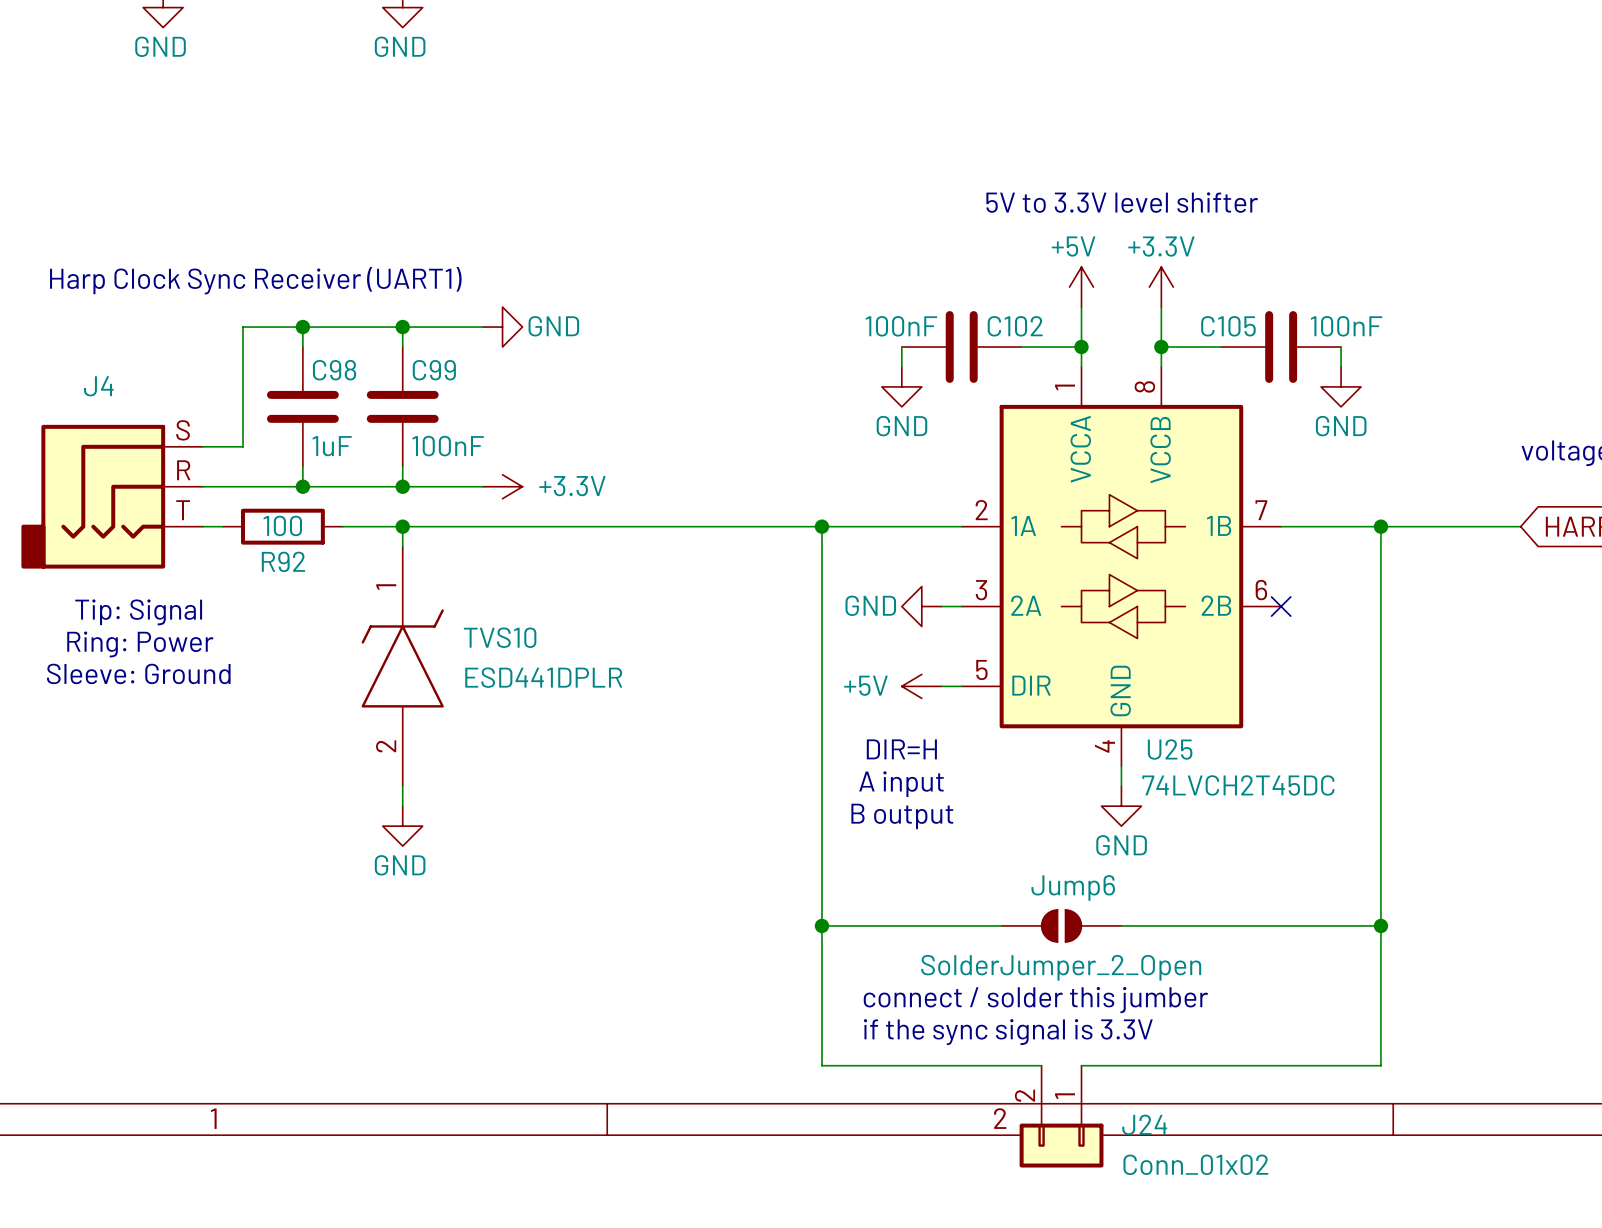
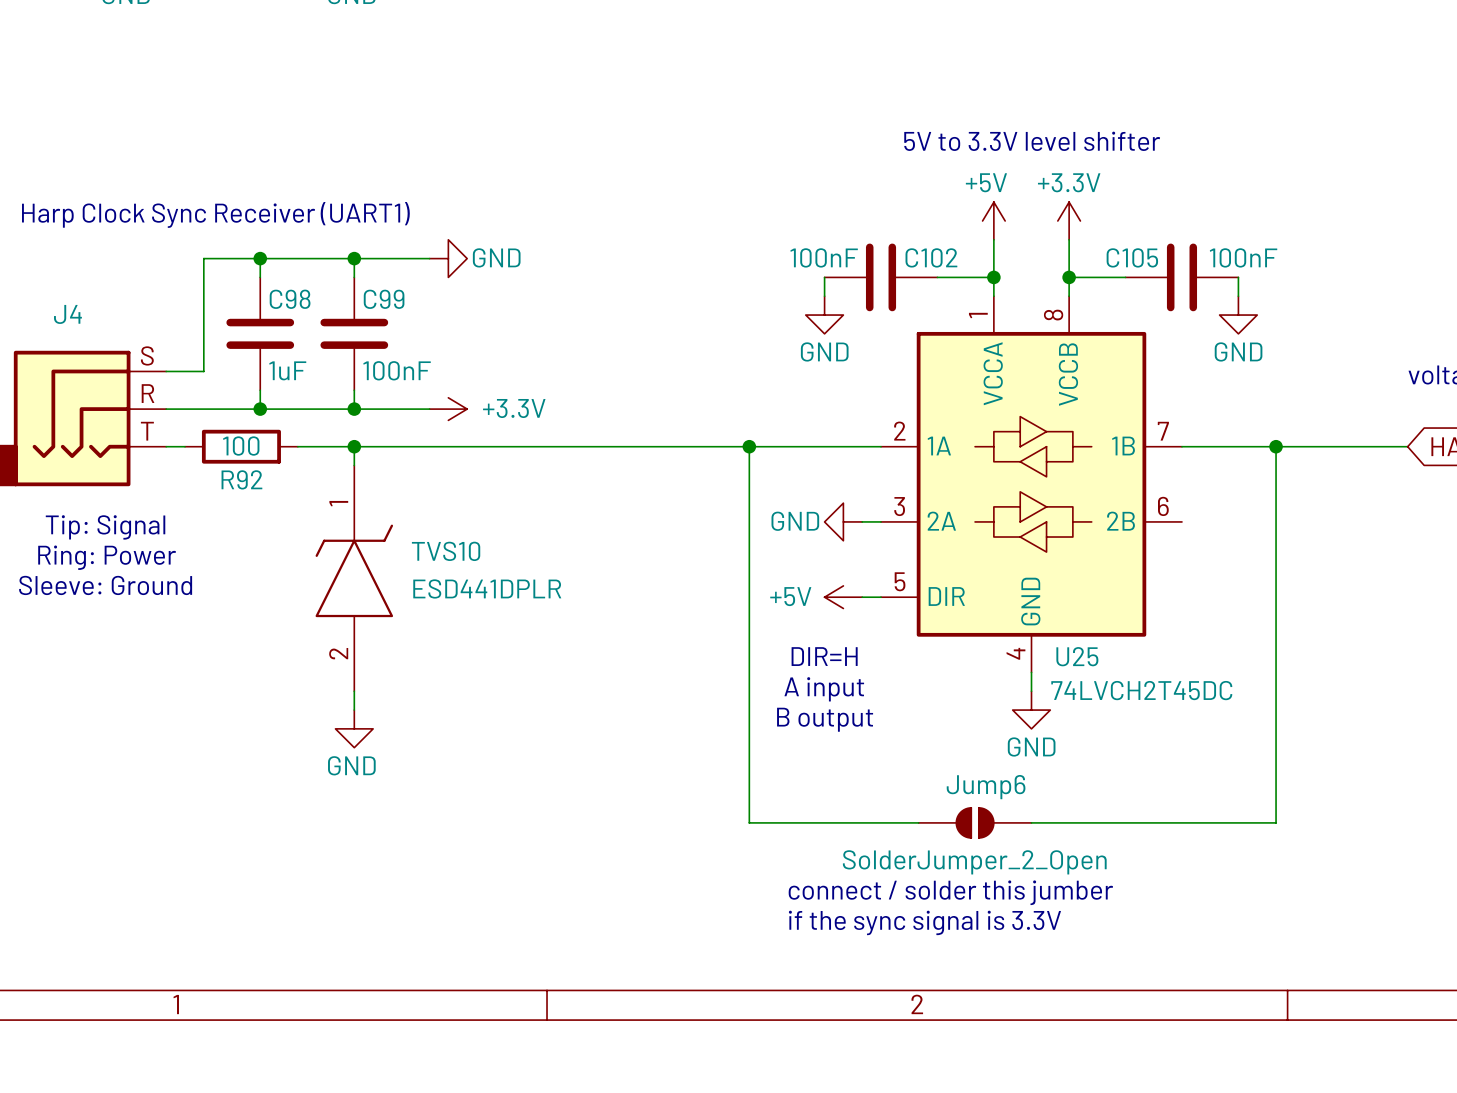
no-connect mark: (1281, 606) -> none
wire: (821, 925) (821, 1065) (1041, 1065) -> none
junction: (821, 925) -> none
wire: (1380, 925) (1380, 1065) (1081, 1065) -> none
junction: (1380, 925) -> none
J24: Conn_01x02 (1061, 1116) -> none

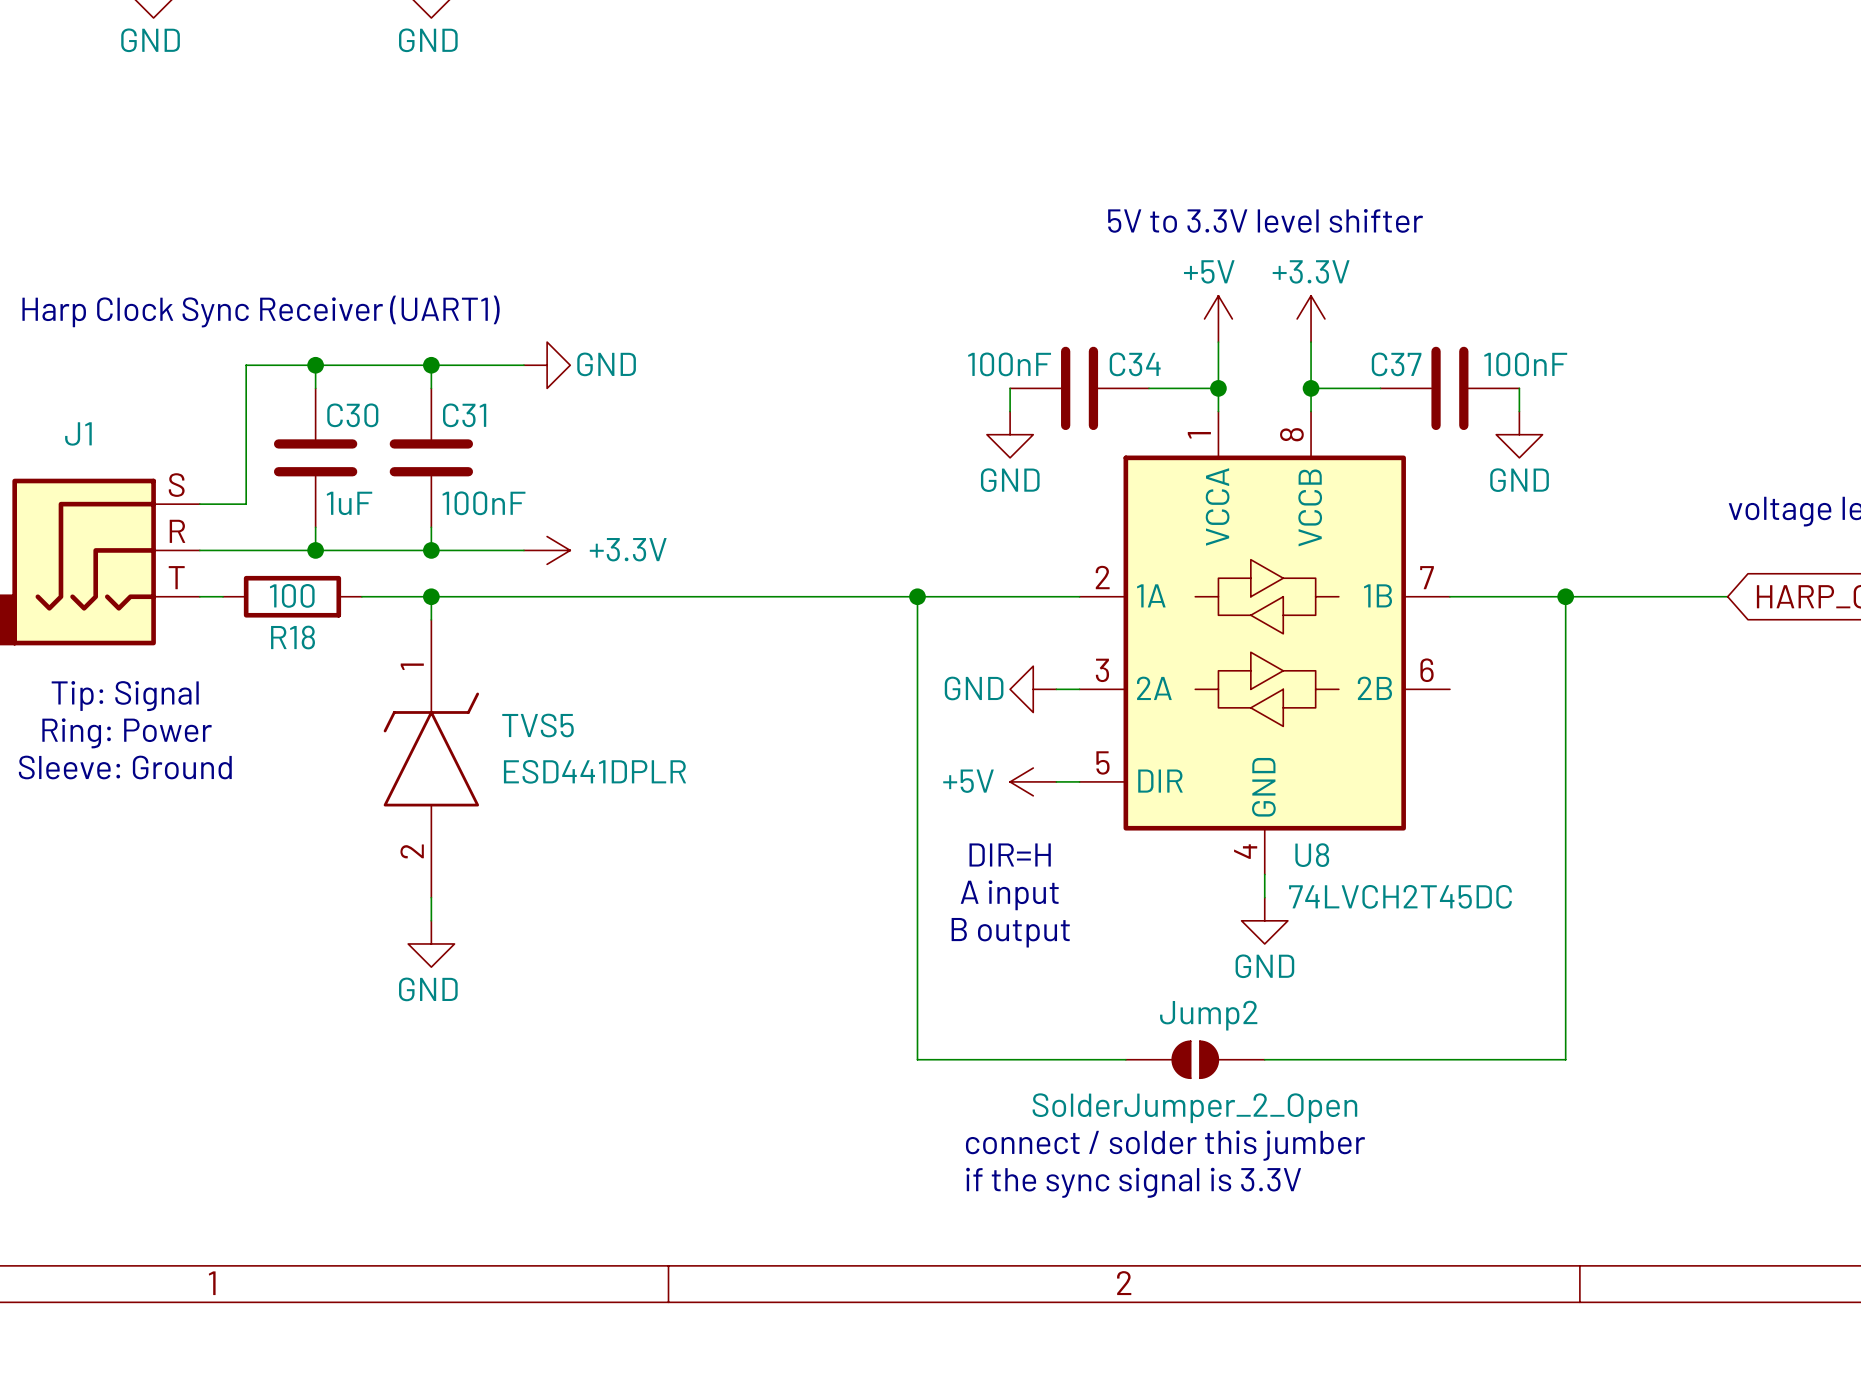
C102 name: C102 (931, 257) -> C34 (1135, 364)
C105 name: C105 (1132, 257) -> C37 (1396, 364)
C98 name: C98 (290, 299) -> C30 (352, 415)
C99 name: C99 (384, 299) -> C31 (464, 415)
J4 name: J4 (67, 314) -> J1 (78, 433)
R92 name: R92 (241, 479) -> R18 (293, 637)
TVS10 name: TVS10 (446, 551) -> TVS5 (538, 725)
U25 name: U25 (1077, 656) -> U8 (1312, 855)
Jump6 name: Jump6 (986, 787) -> Jump2 (1208, 1015)

